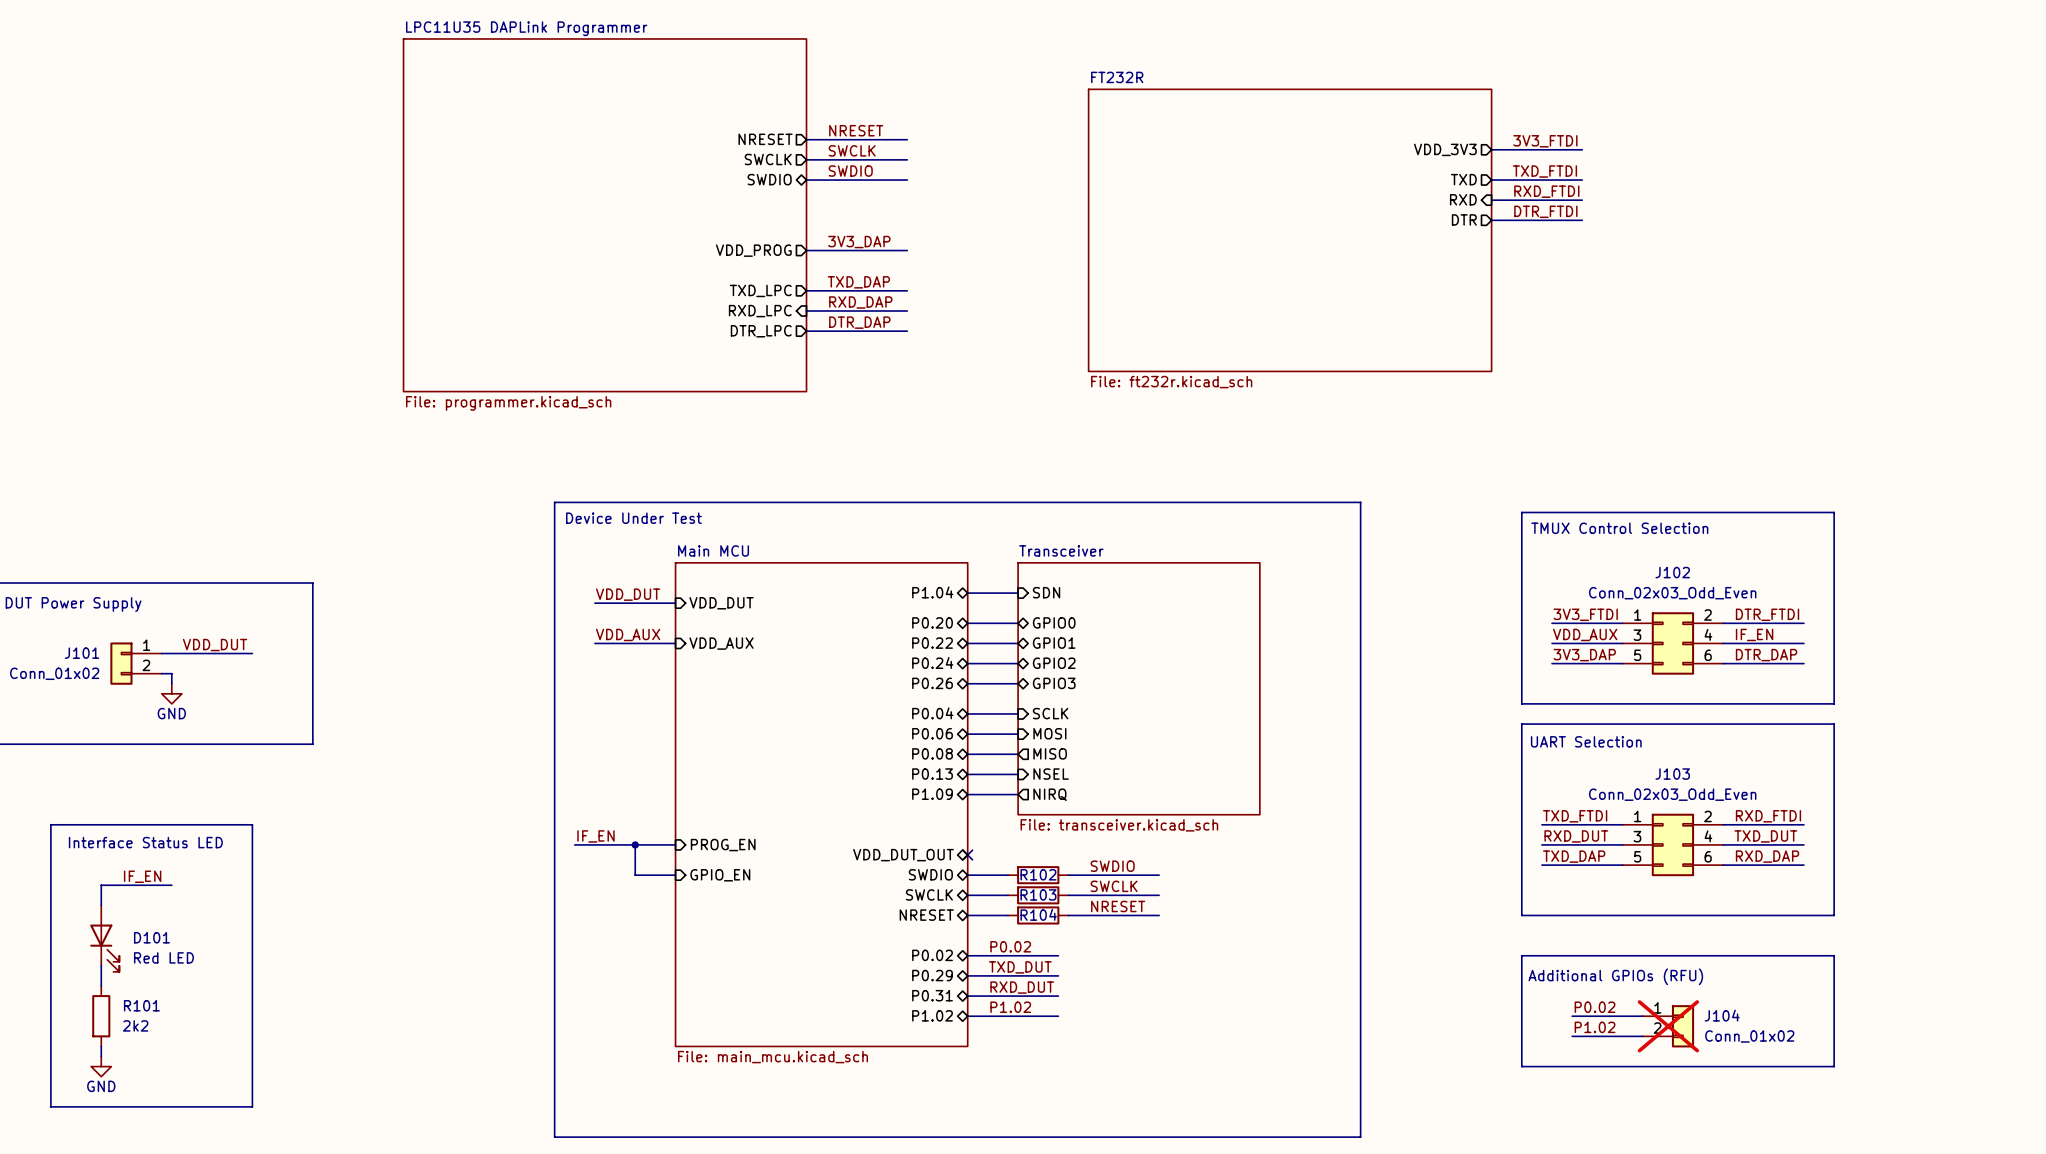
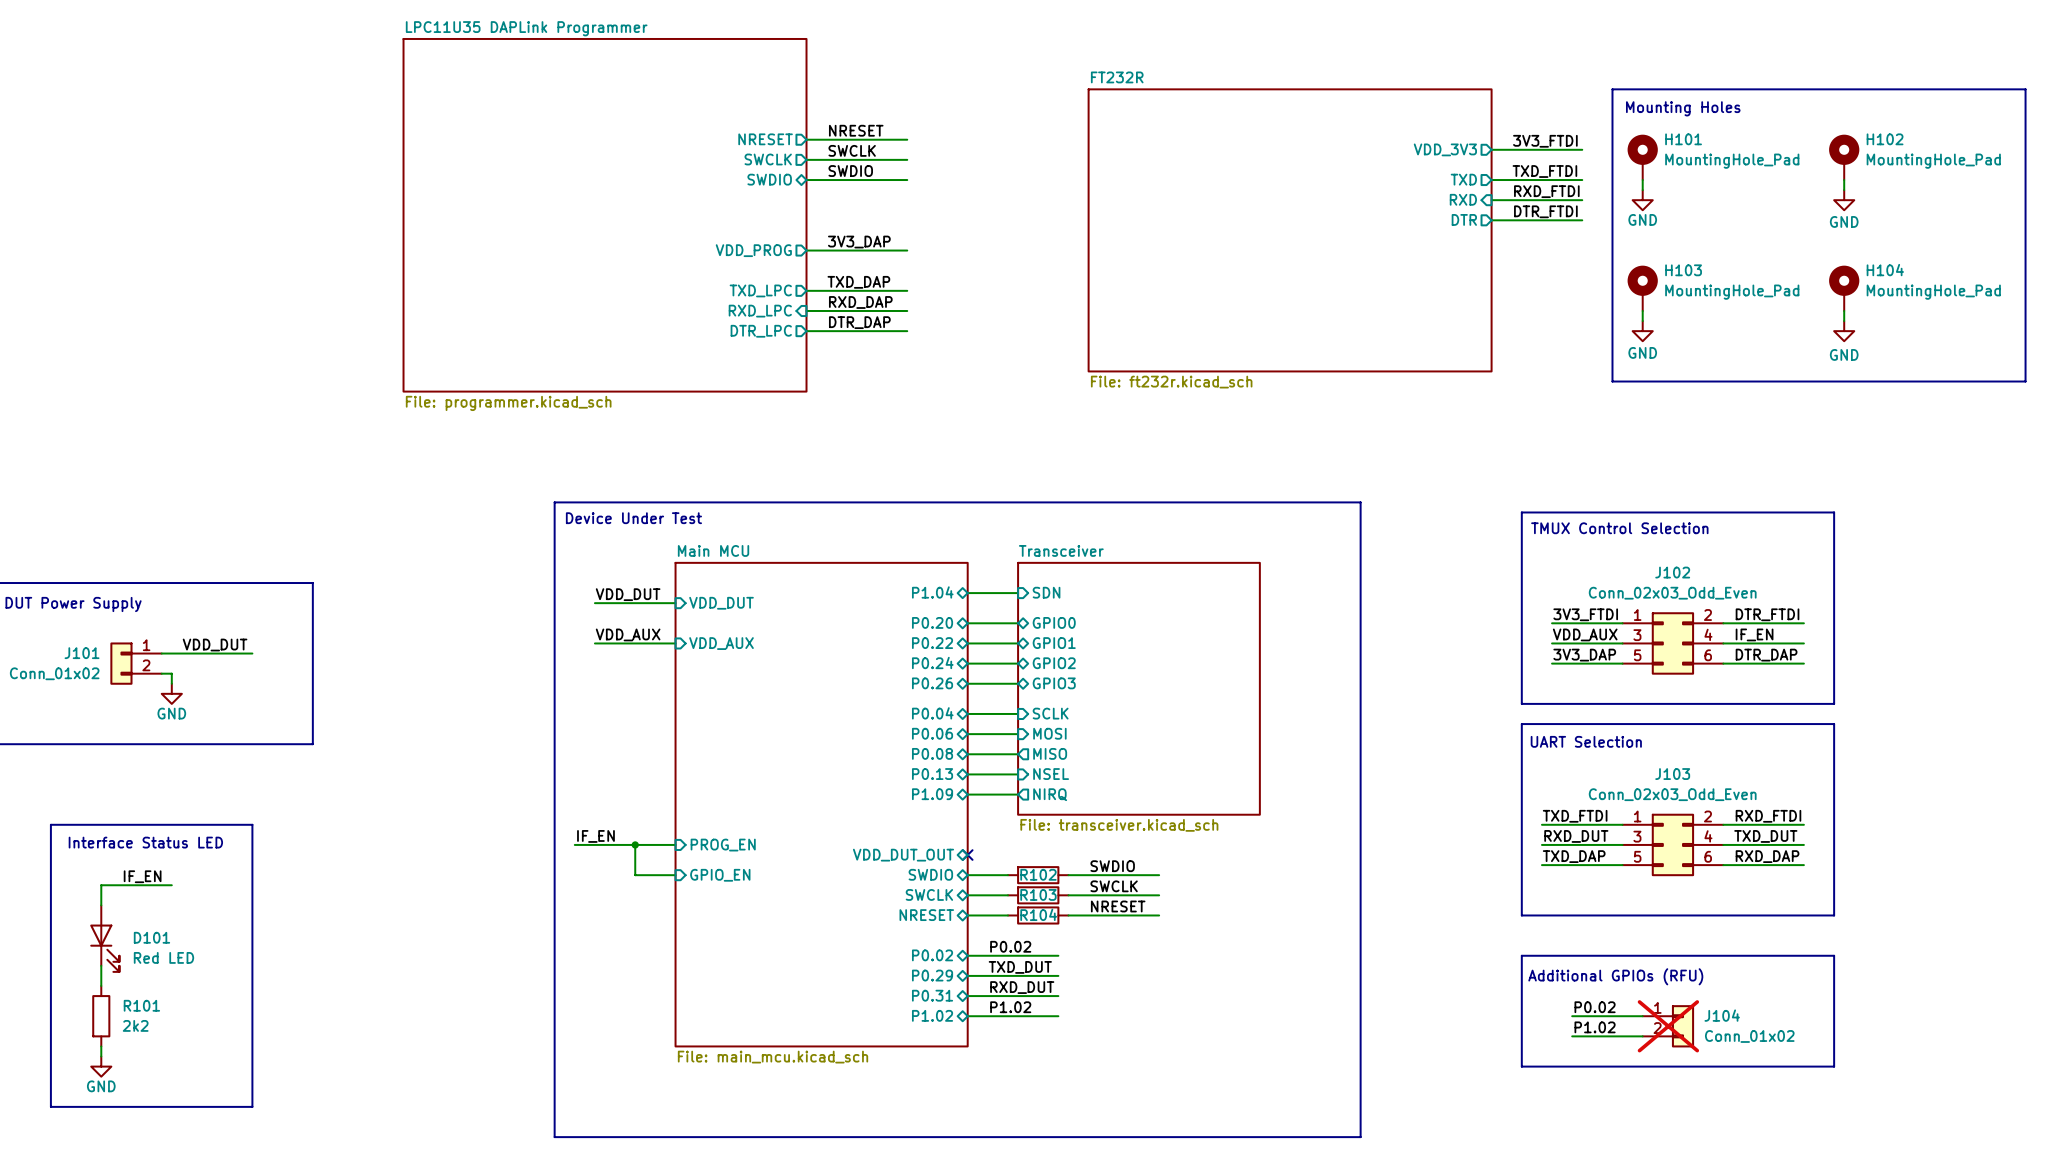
line: none -> (1612, 89) (2025, 89) (2025, 381) (1612, 381) (1612, 89)
text: none -> Mounting Holes (1683, 108)
H101: none -> MountingHole_Pad (1642, 157)
H102: none -> MountingHole_Pad (1844, 157)
wire: none -> (1642, 180) (1642, 190)
wire: none -> (1844, 180) (1844, 190)
power symbol: none -> GND (1642, 200)
power symbol: none -> GND (1844, 200)
H103: none -> MountingHole_Pad (1642, 288)
H104: none -> MountingHole_Pad (1844, 288)
wire: none -> (1642, 310) (1642, 321)
wire: none -> (1844, 310) (1844, 321)
power symbol: none -> GND (1642, 331)
power symbol: none -> GND (1844, 331)

